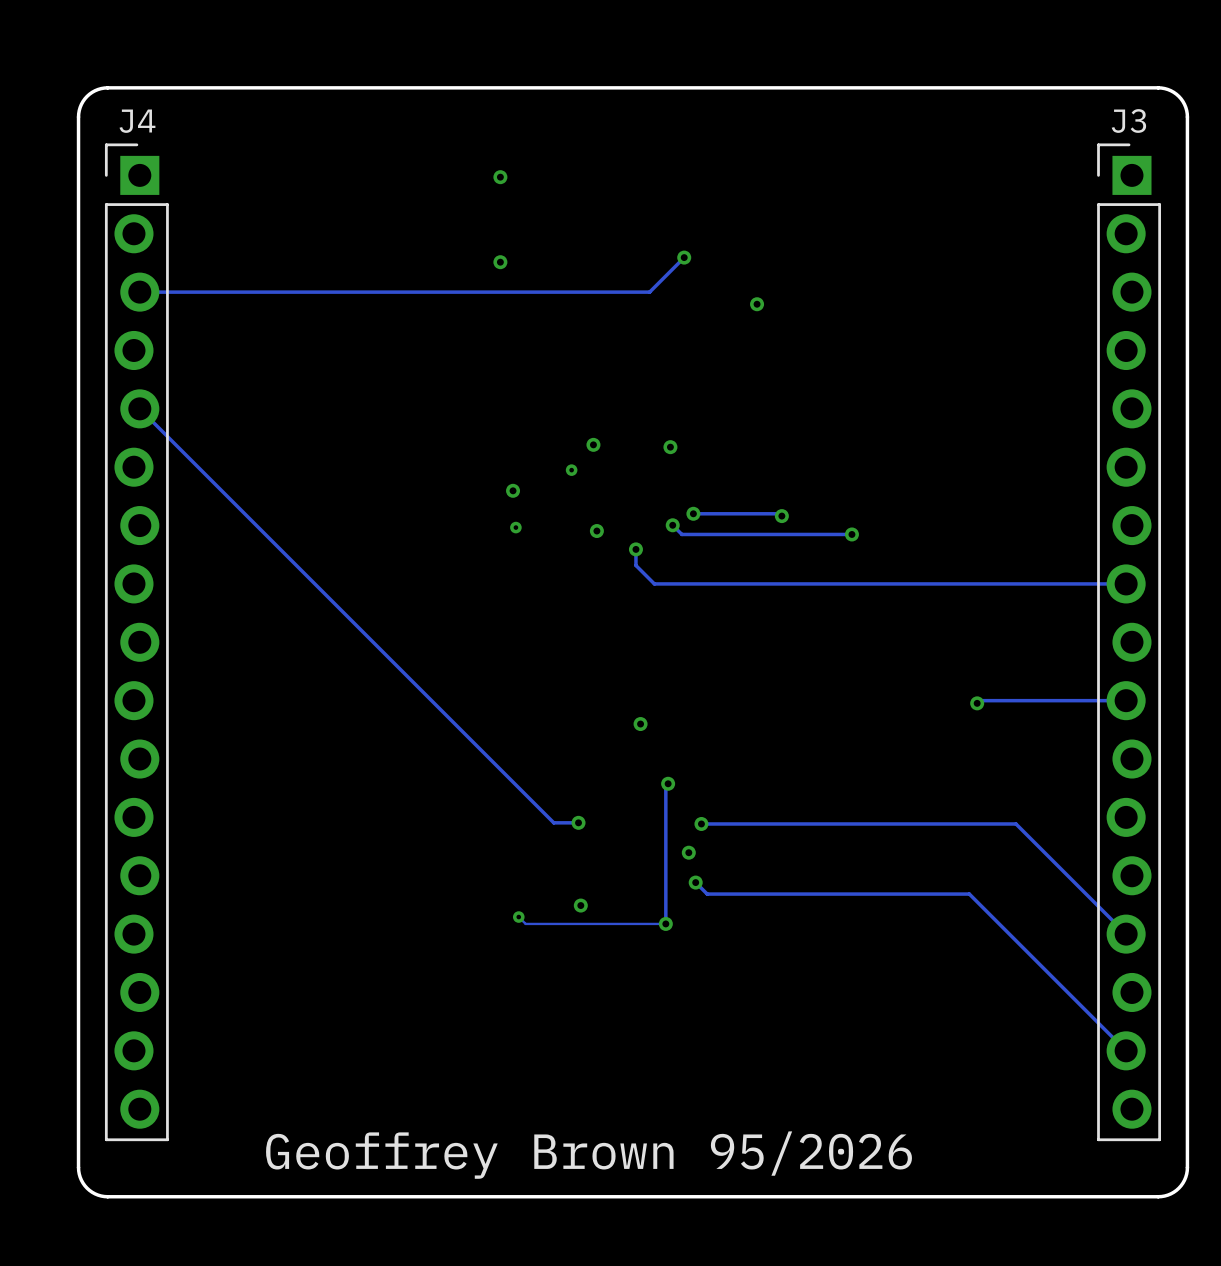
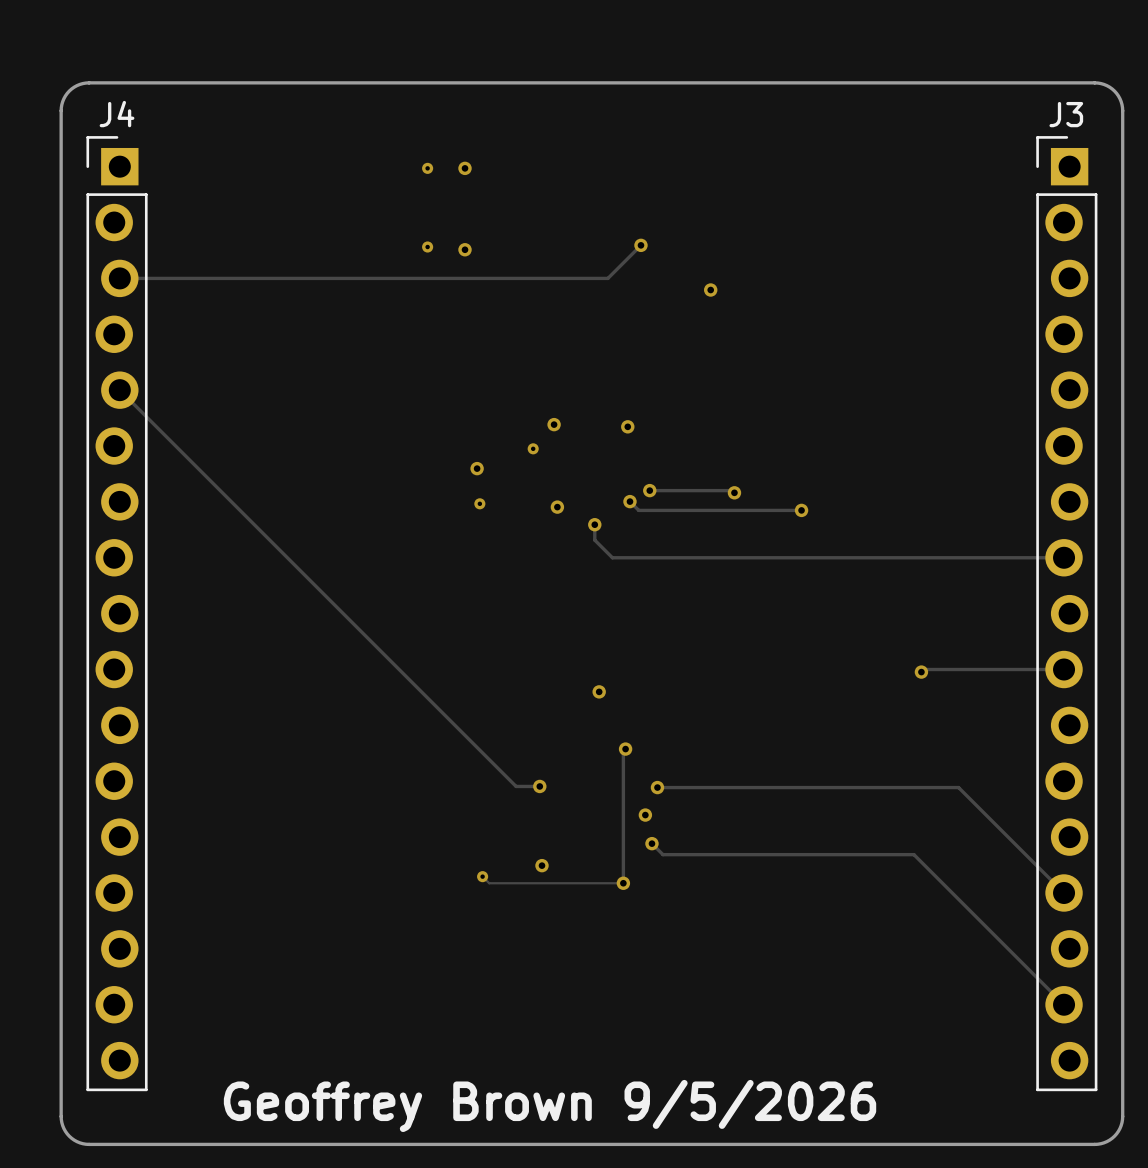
via: none -> (427, 168)
via: none -> (427, 247)
text: Geoffrey Brown 95/2026 (589, 1155) -> Geoffrey Brown 9/5/2026 (550, 1105)

